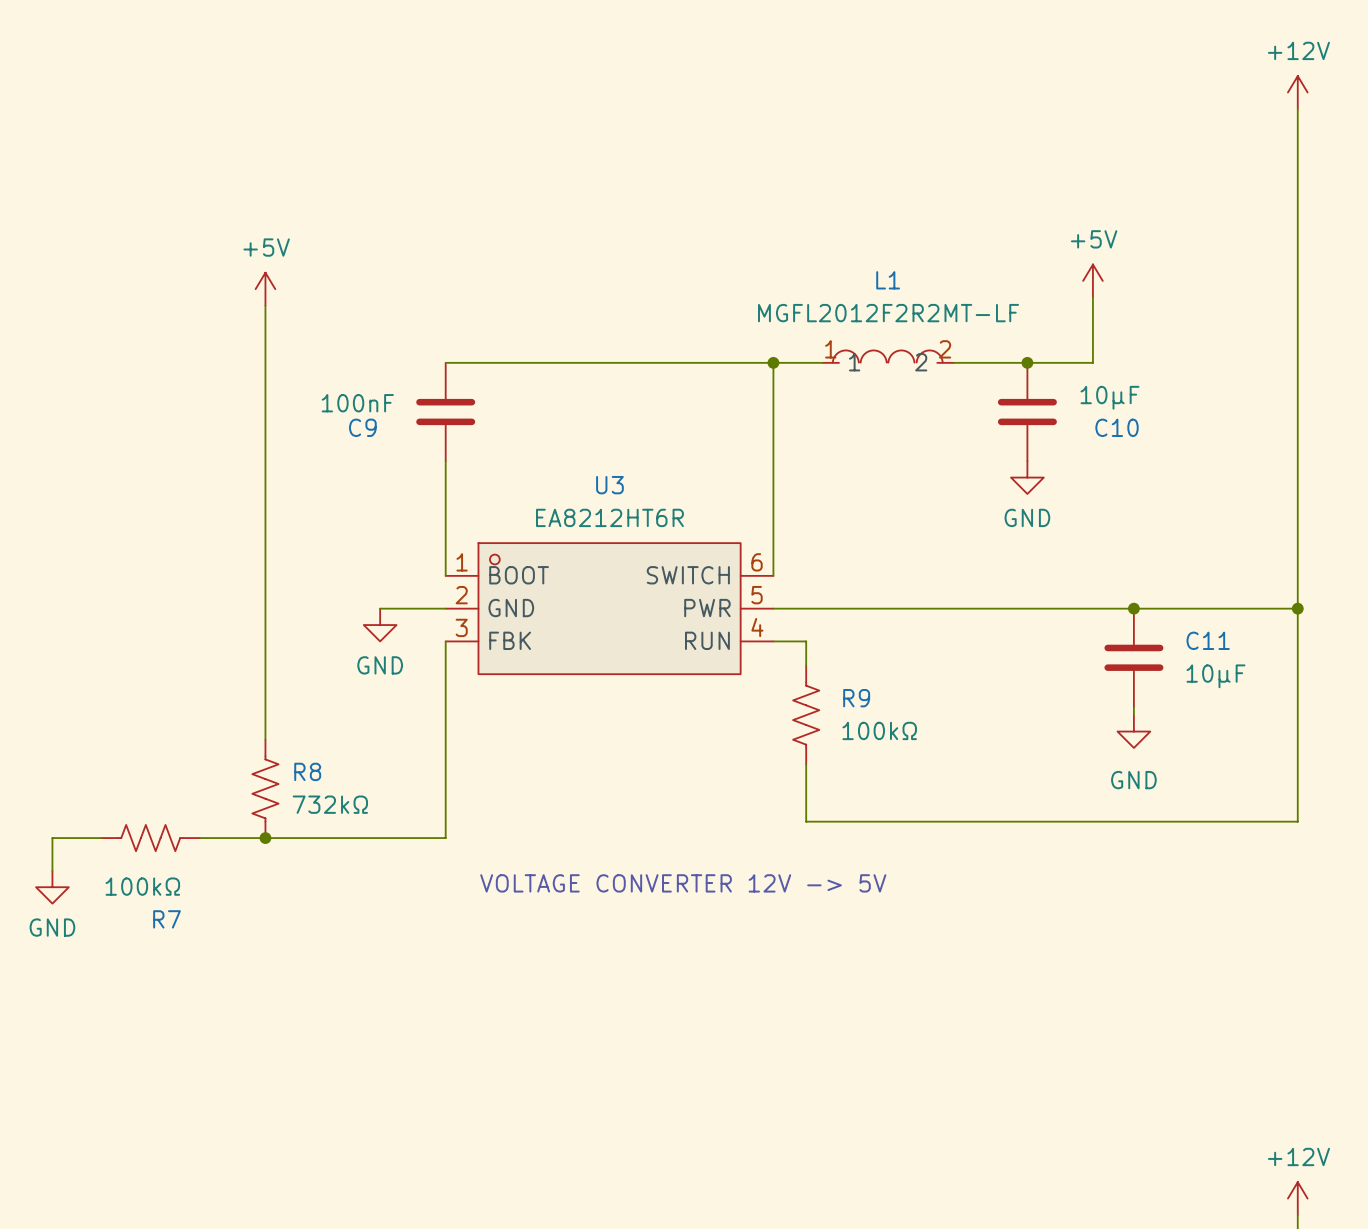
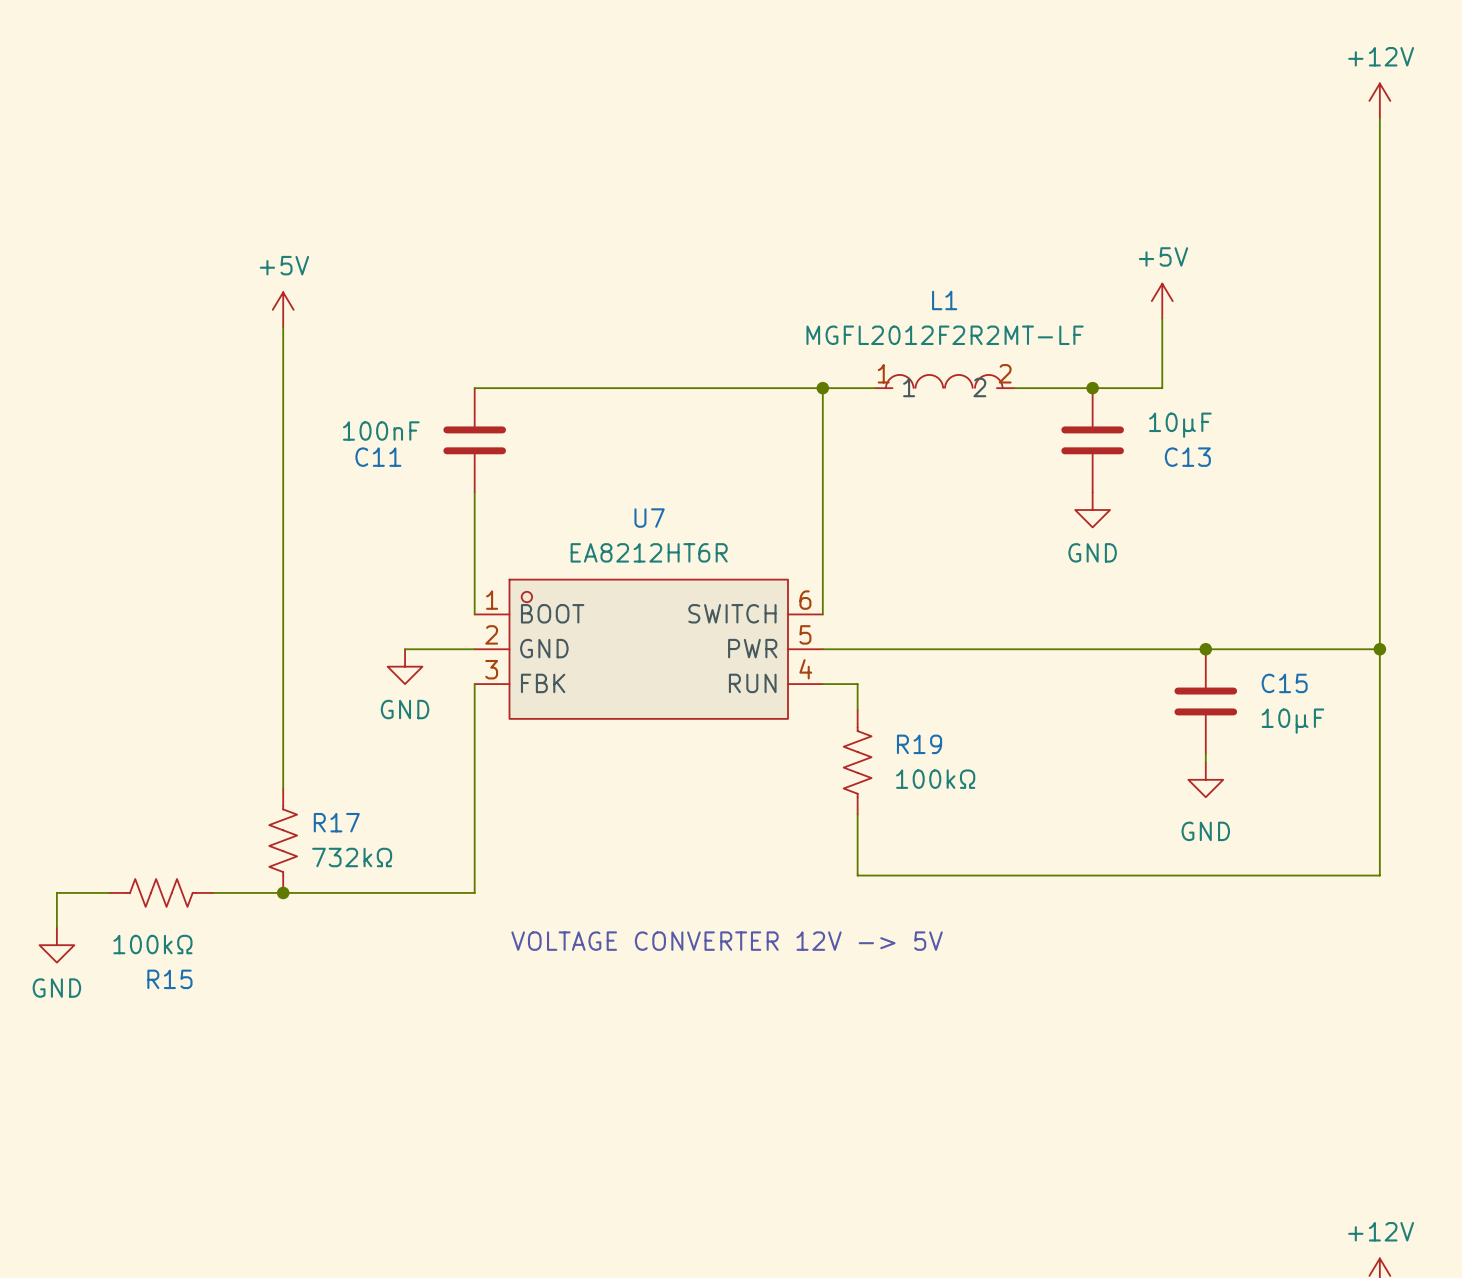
C9 name: C9 (362, 427) -> C11 (378, 457)
C10 name: C10 (1117, 427) -> C13 (1187, 457)
U3 name: U3 (609, 485) -> U7 (649, 518)
C11 name: C11 (1208, 640) -> C15 (1284, 683)
R9 name: R9 (856, 698) -> R19 (919, 744)
R8 name: R8 (307, 771) -> R17 (336, 822)
R7 name: R7 (167, 919) -> R15 (169, 979)

